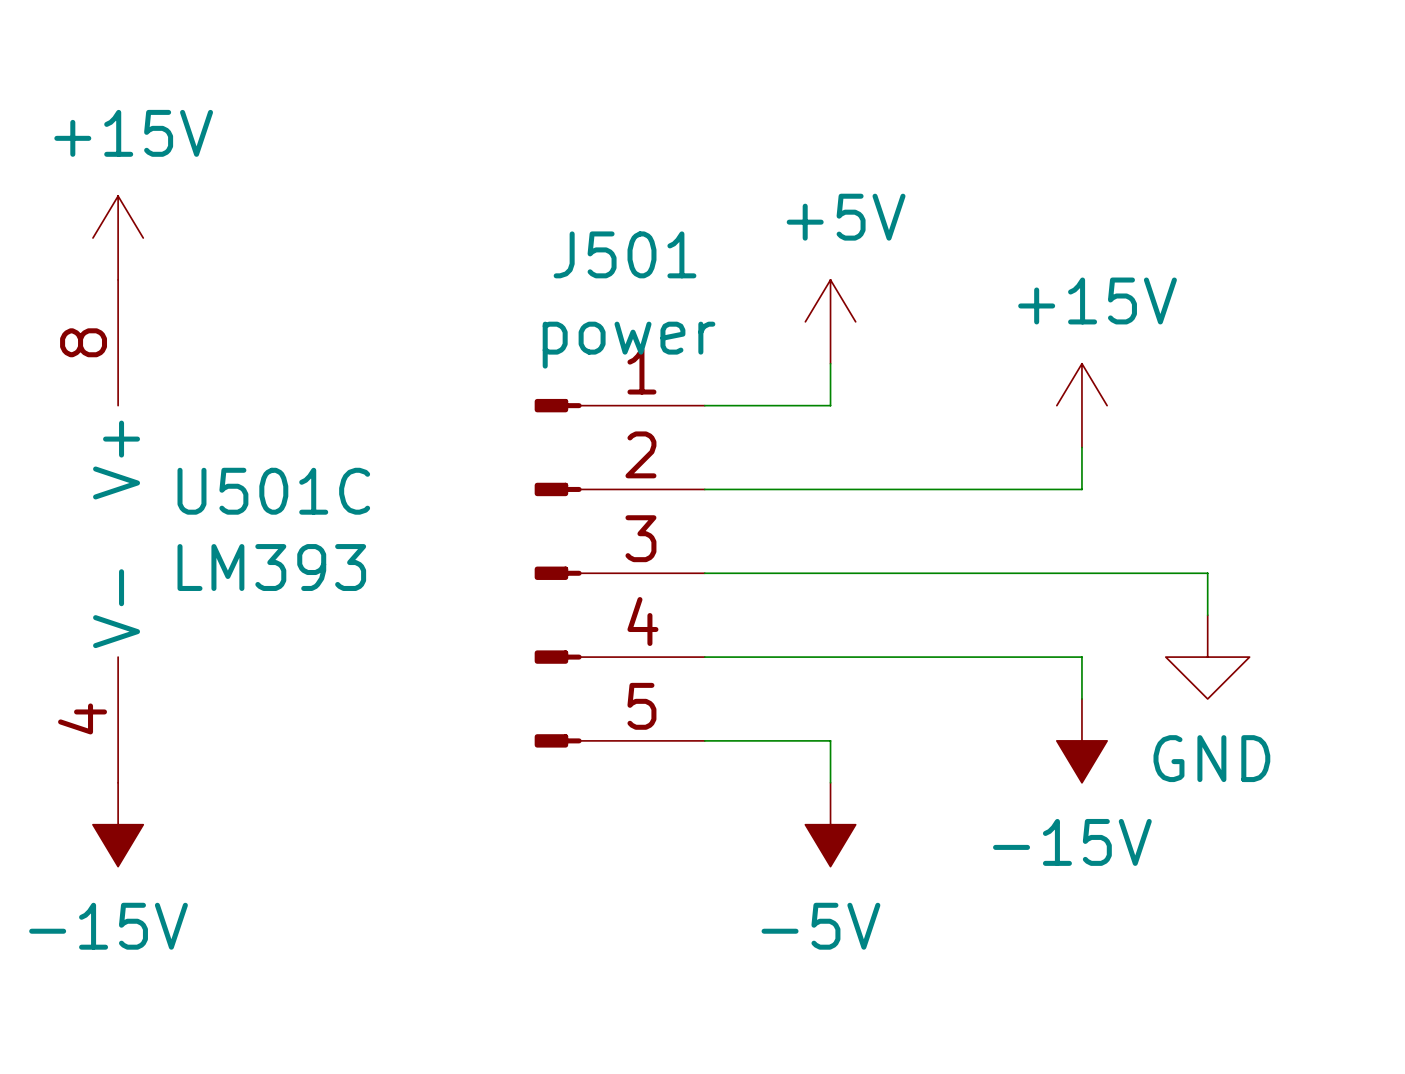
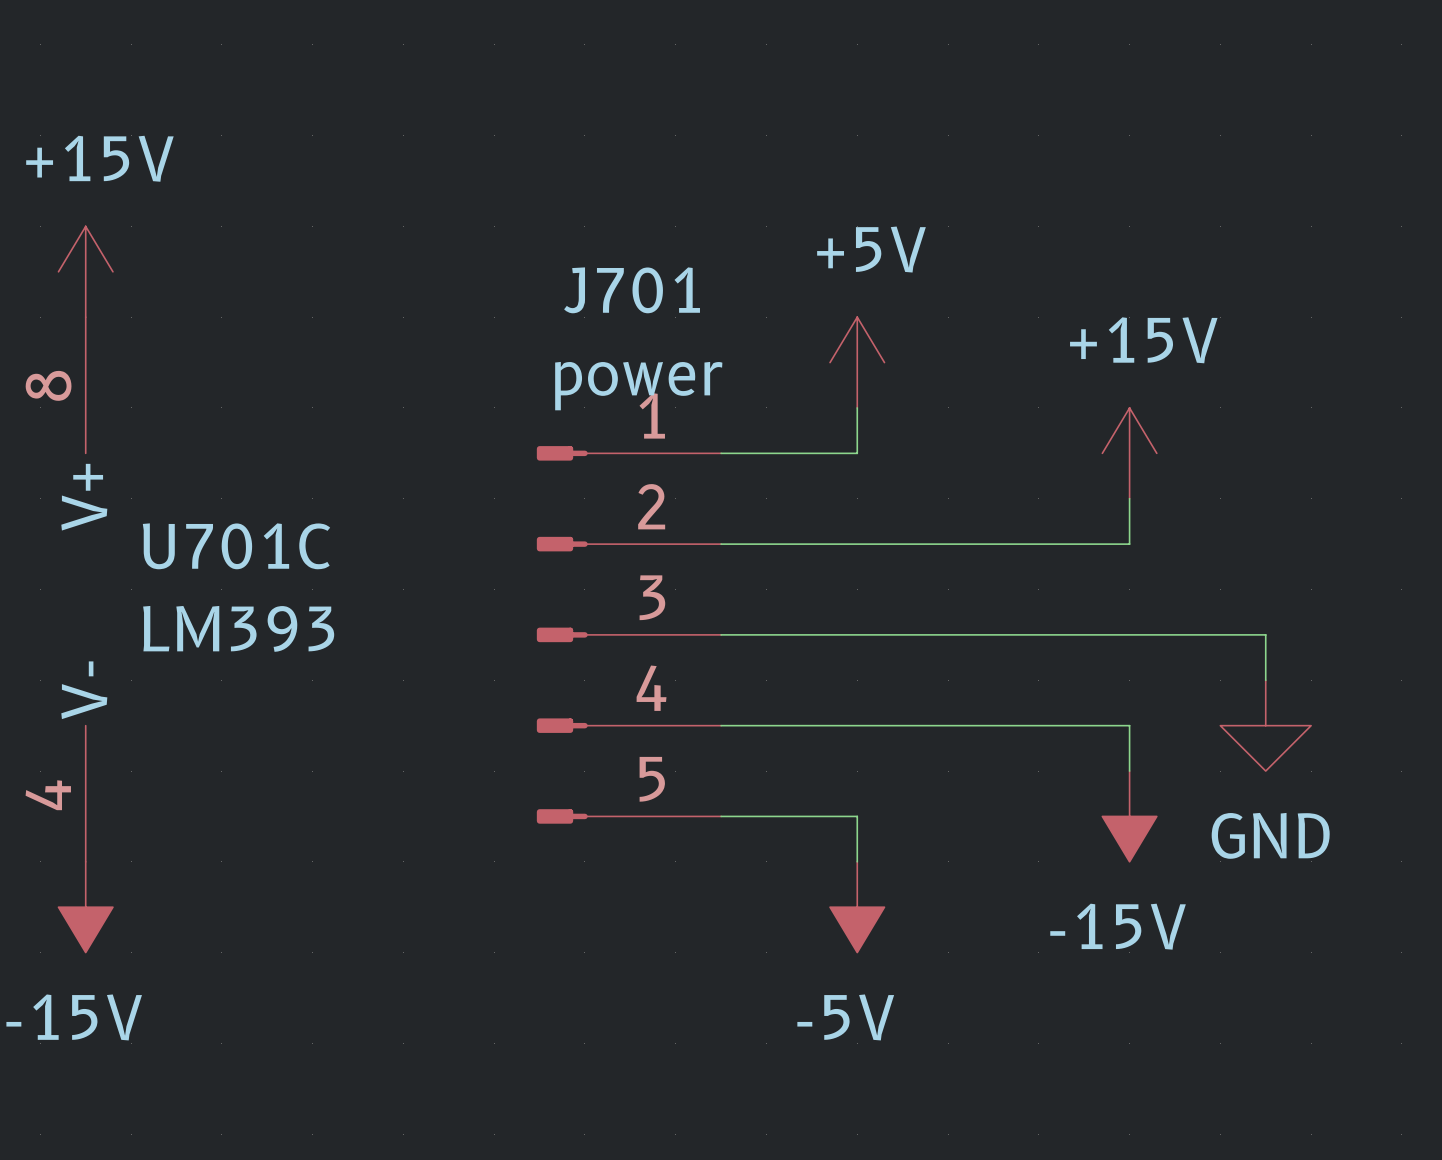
J501 name: J501 (625, 254) -> J701 (632, 290)
U501C name: U501C (273, 491) -> U701C (236, 546)

